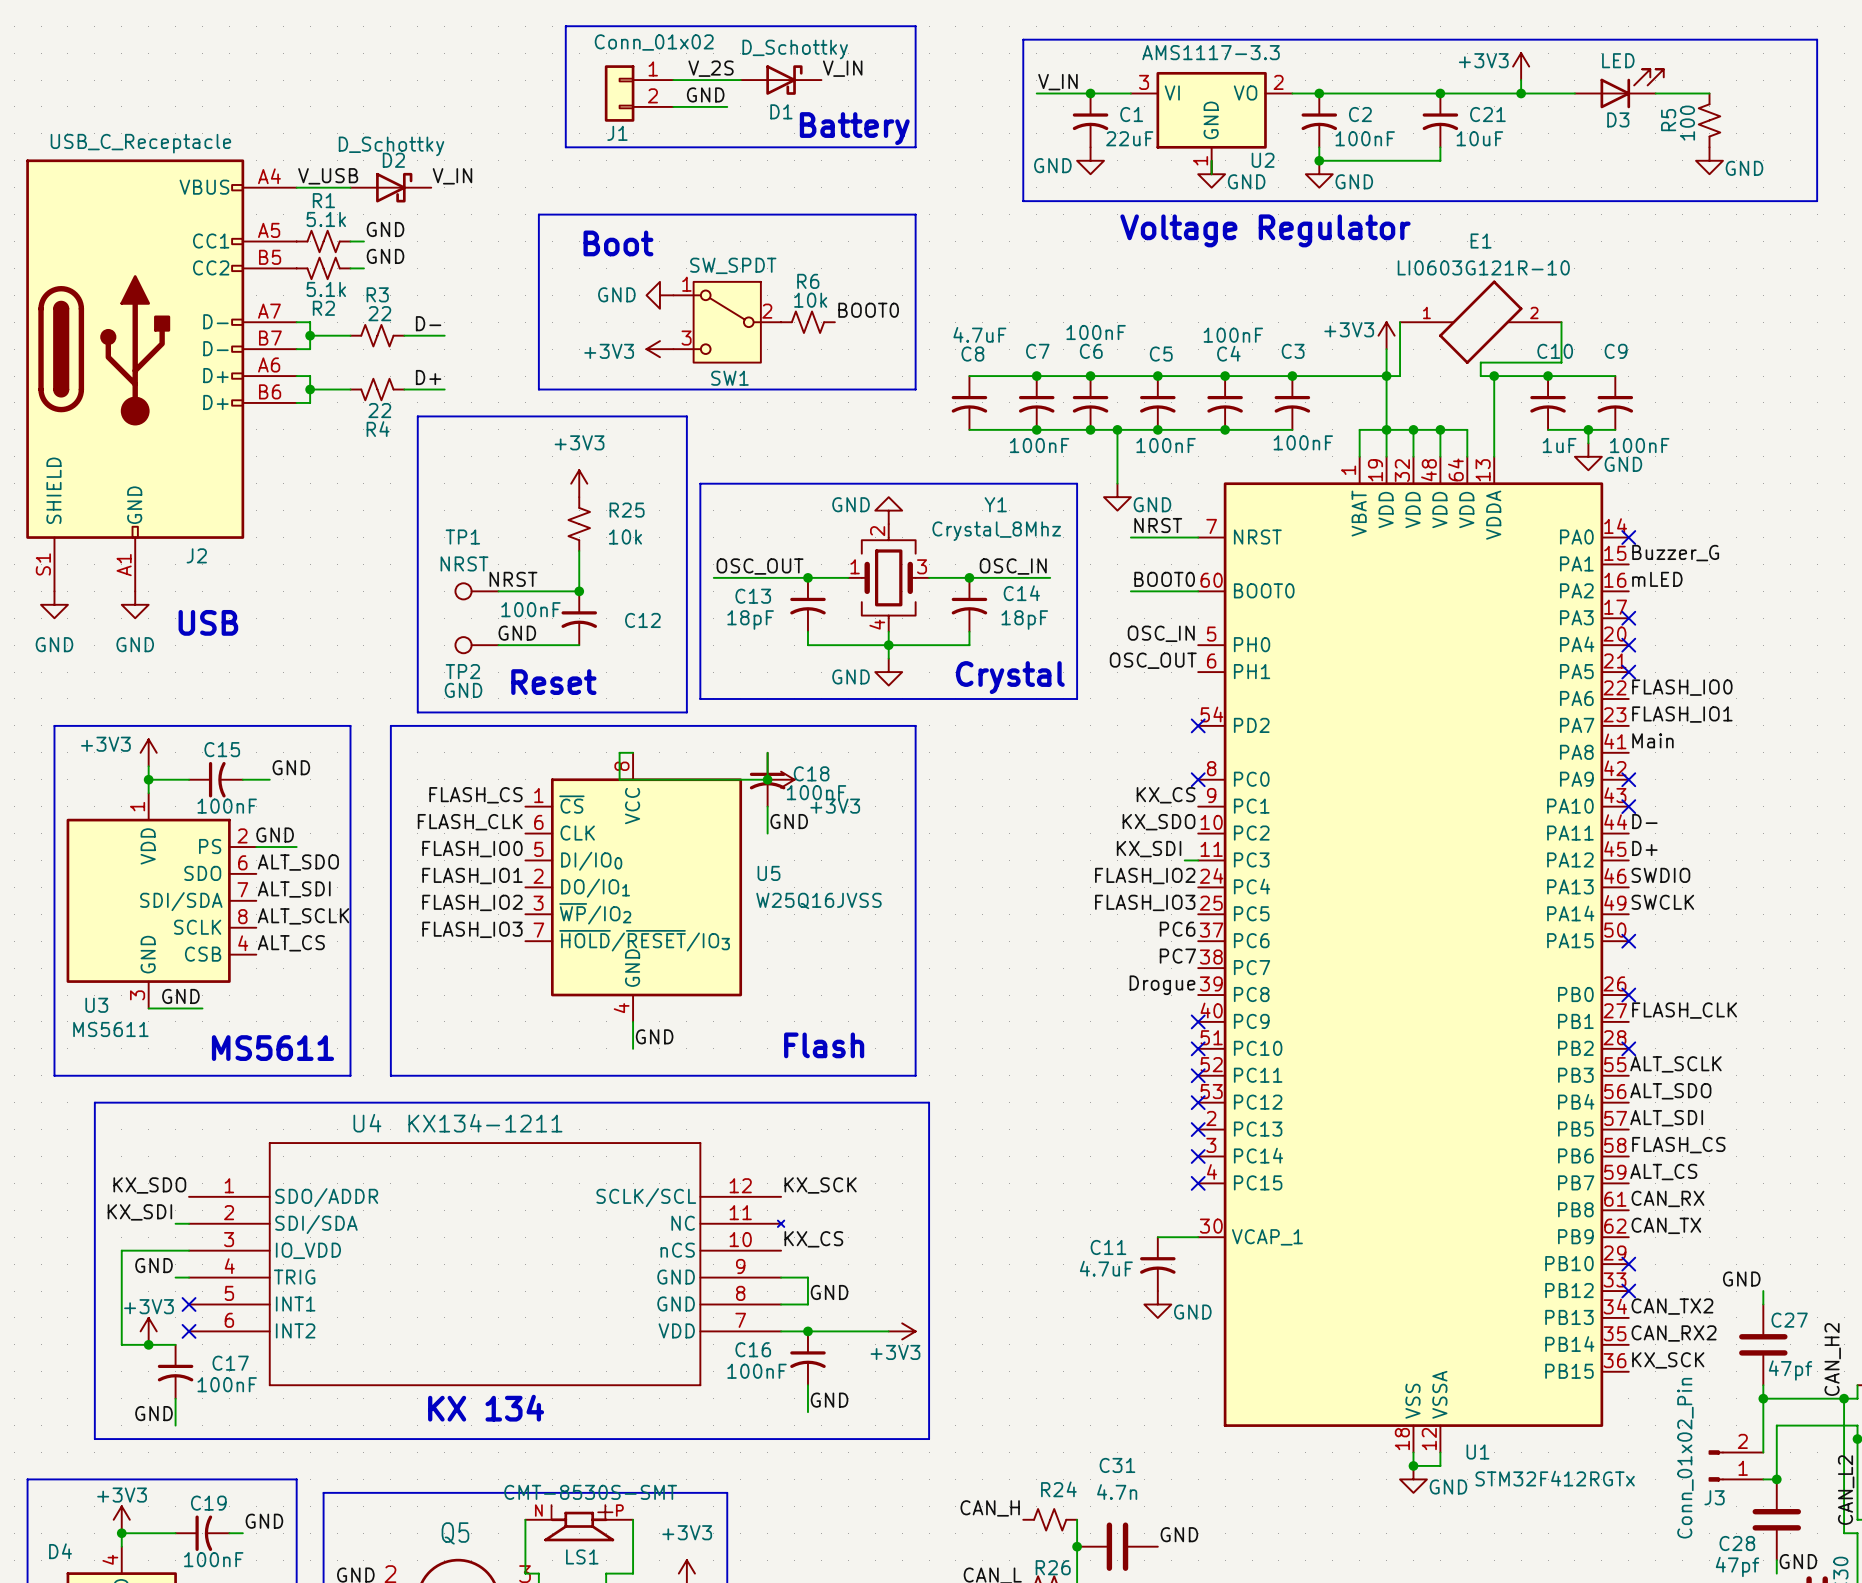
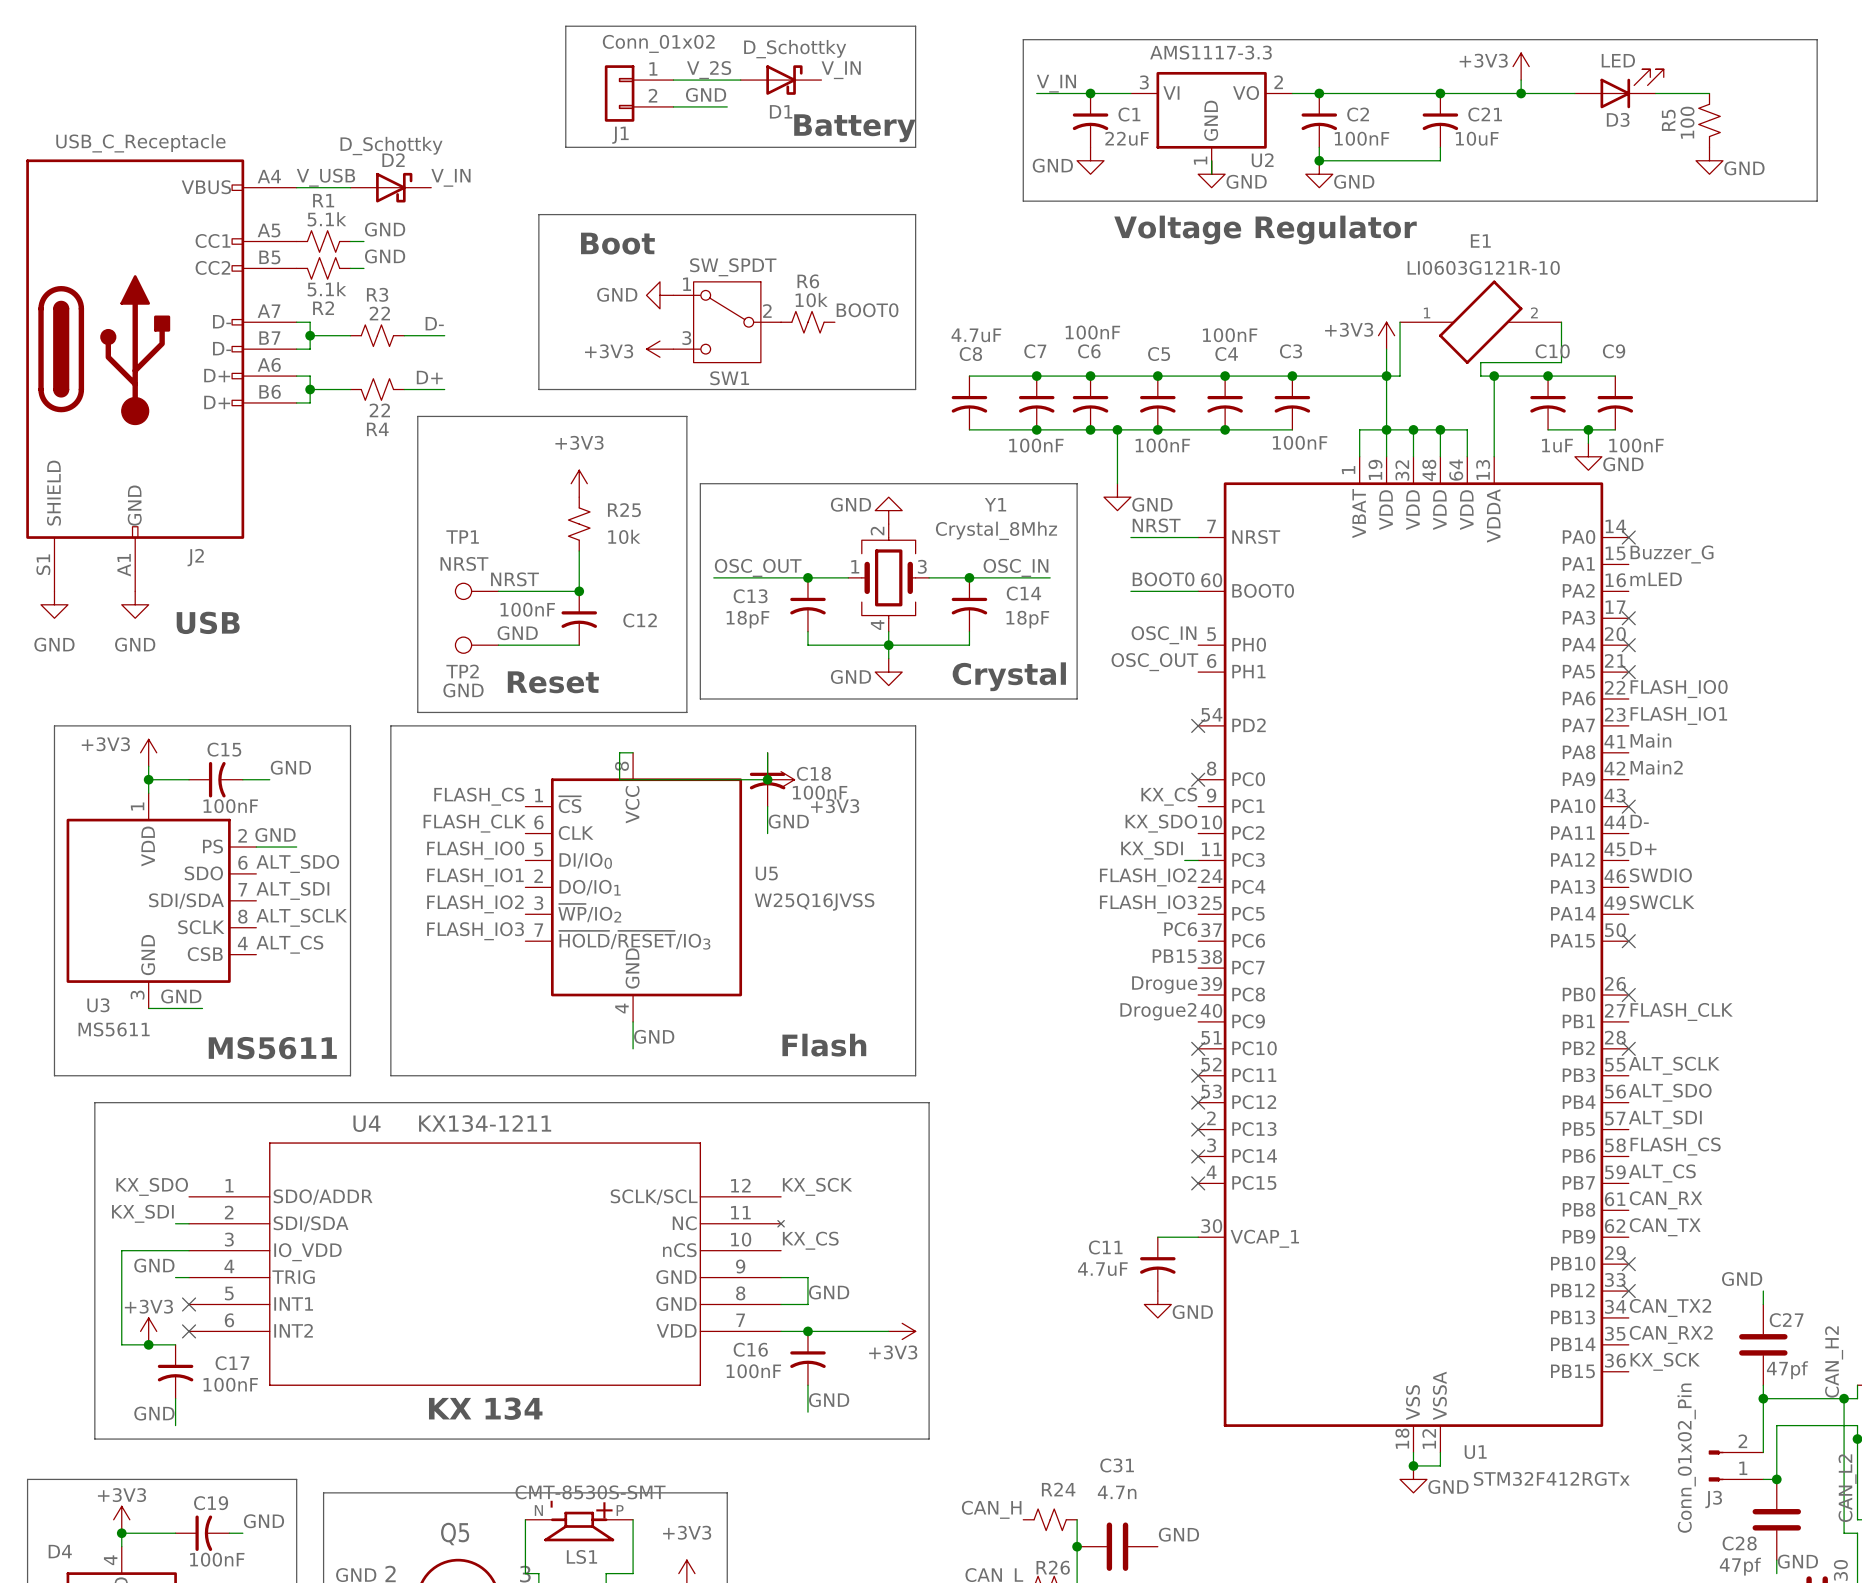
label: none -> Main2 (1656, 767)
no-connect mark: (1628, 779) -> none
label: PC7 (1177, 956) -> PB15 (1174, 956)
label: none -> Drogue2 (1158, 1011)
no-connect mark: (1198, 1021) -> none

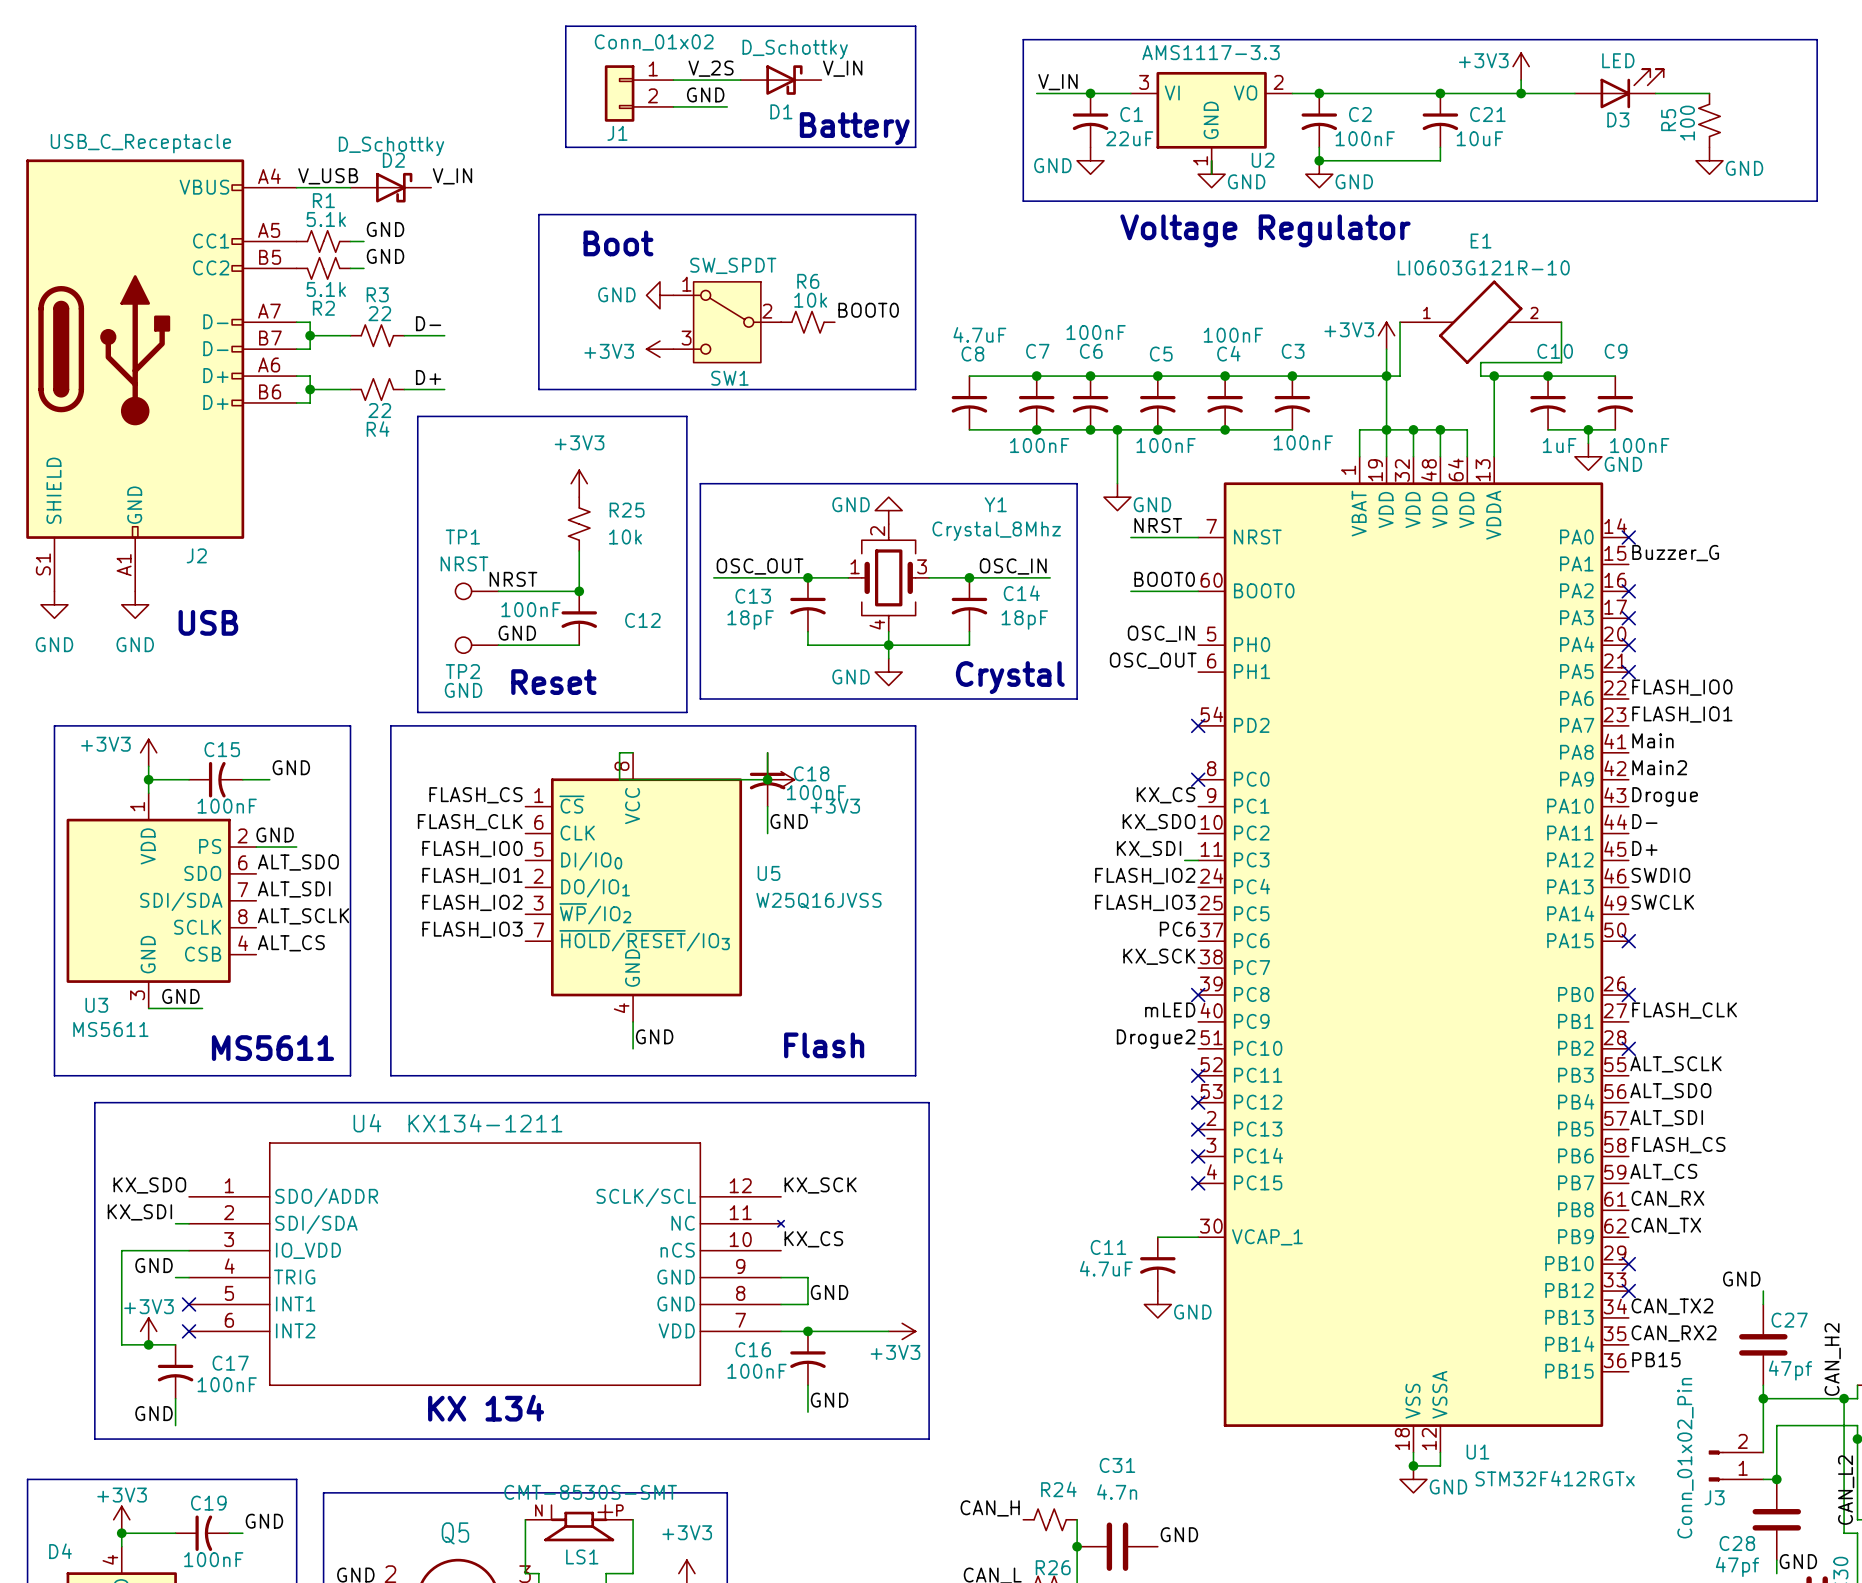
label: mLED (1656, 579) -> none
no-connect mark: none -> (1628, 591)
label: none -> Drogue (1665, 796)
no-connect mark: (1628, 806) -> none
label: PB15 (1174, 956) -> KX_SCK (1159, 956)
label: Drogue (1164, 984) -> none
label: Drogue2 (1158, 1011) -> mLED (1170, 1009)
label: none -> Drogue2 (1156, 1039)
no-connect mark position: (1198, 1048) -> (1198, 995)
label: KX_SCK (1665, 1361) -> PB15 (1656, 1359)

